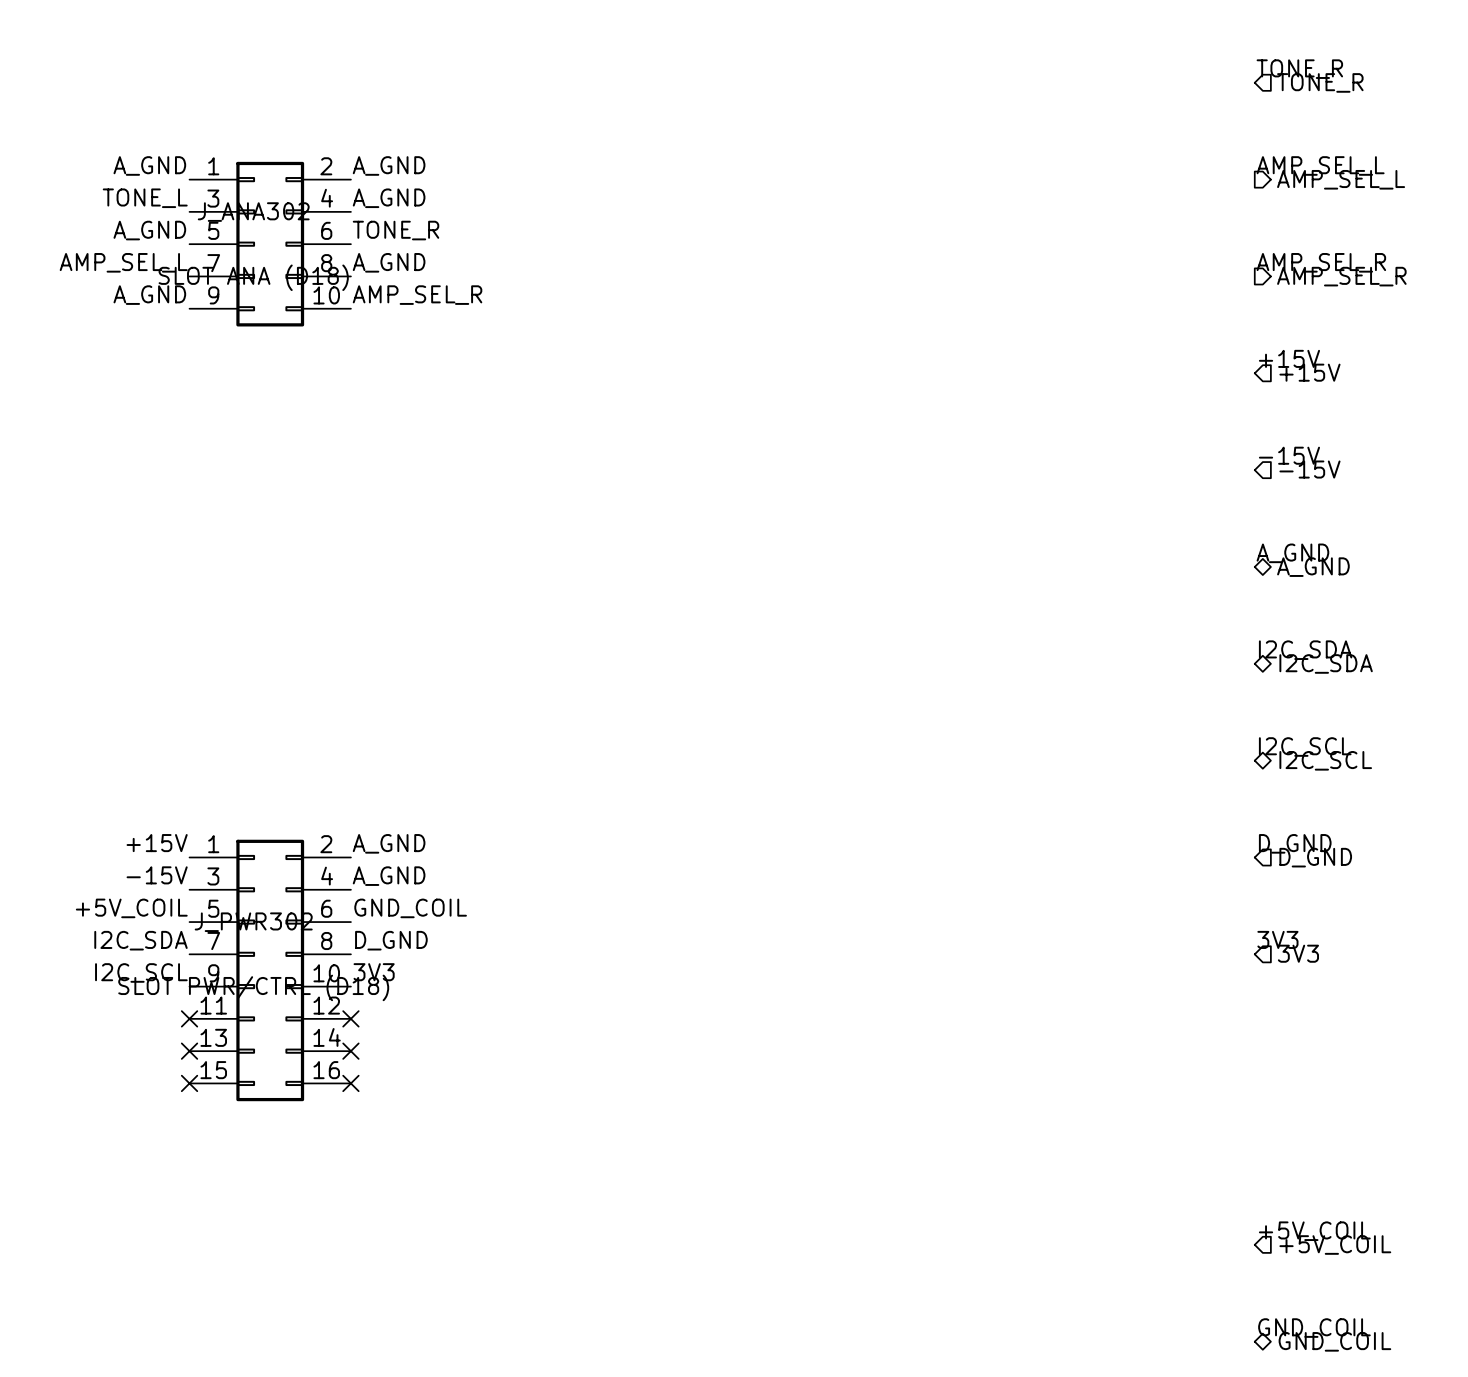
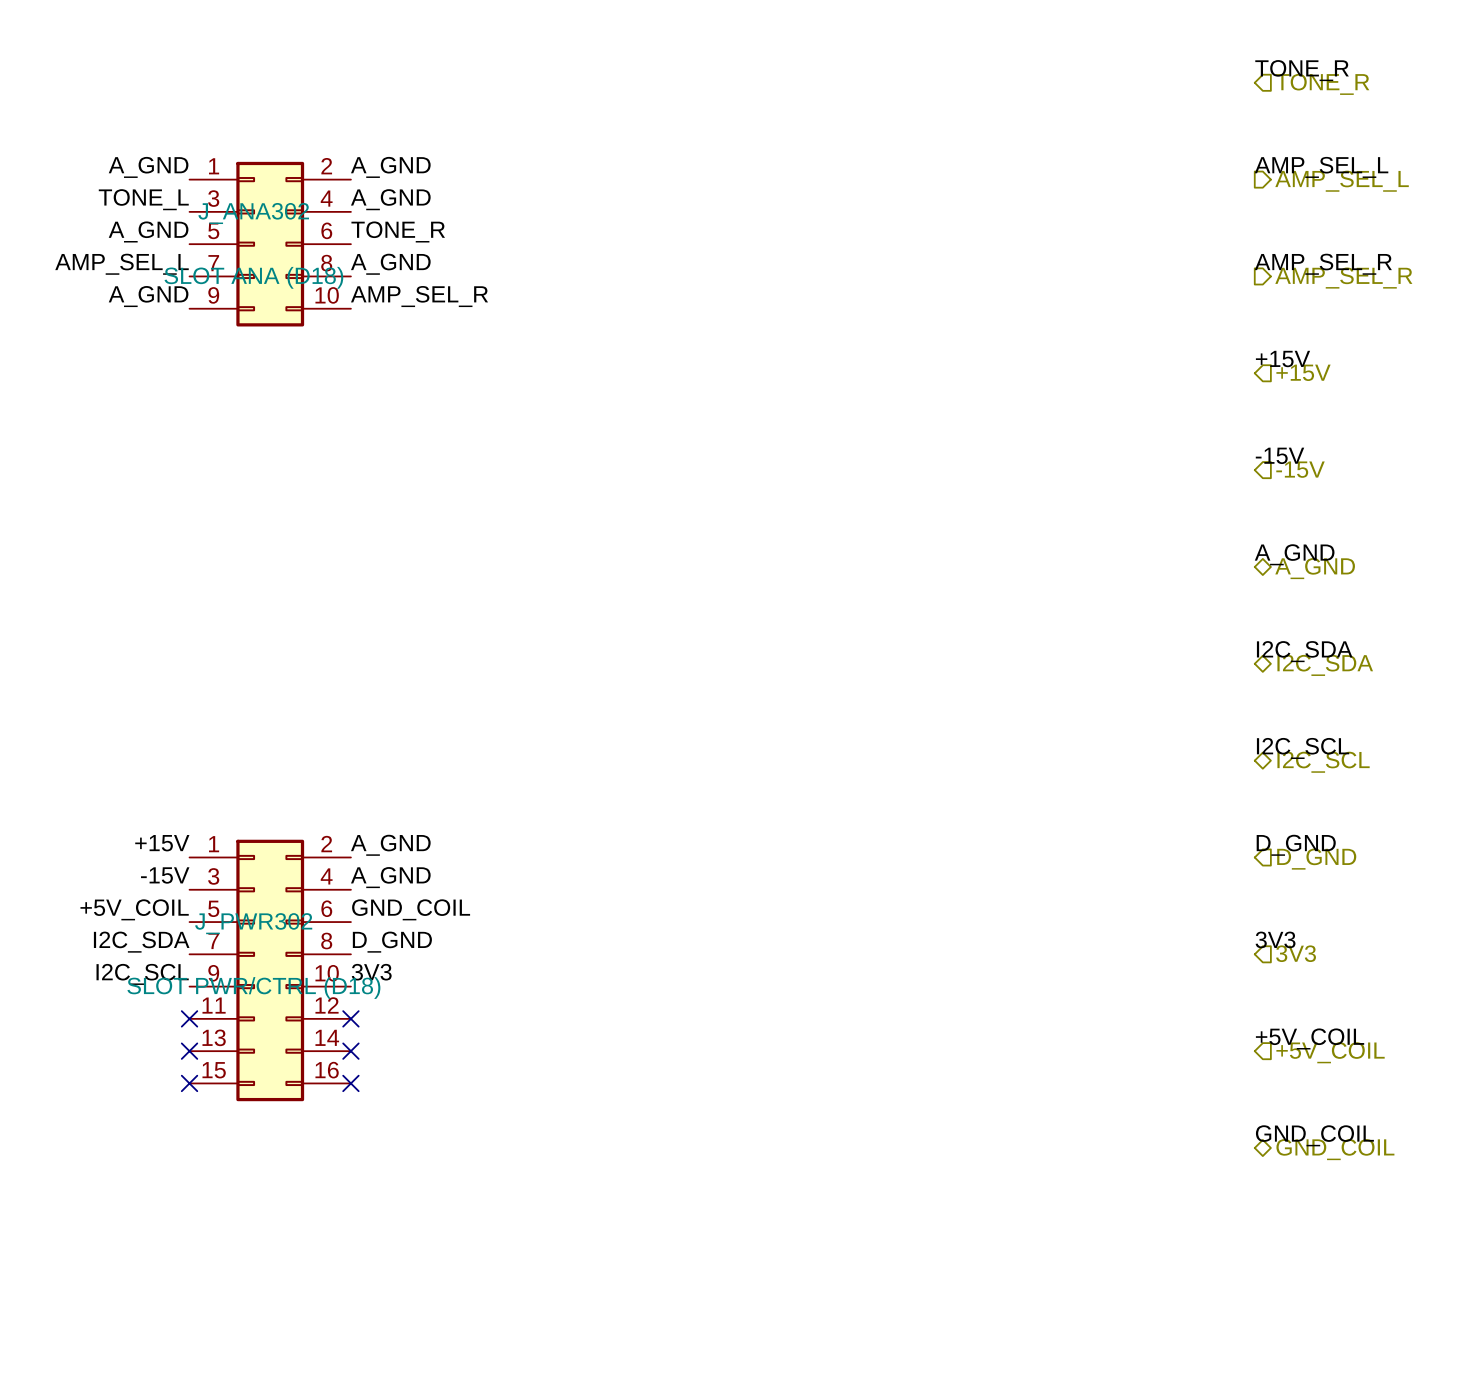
label position: +5V_COIL (1314, 1231) -> +5V_COIL (1310, 1038)
hierarchical label position: +5V_COIL (1335, 1245) -> +5V_COIL (1330, 1052)
label position: GND_COIL (1314, 1328) -> GND_COIL (1314, 1135)
hierarchical label position: GND_COIL (1334, 1341) -> GND_COIL (1335, 1149)

